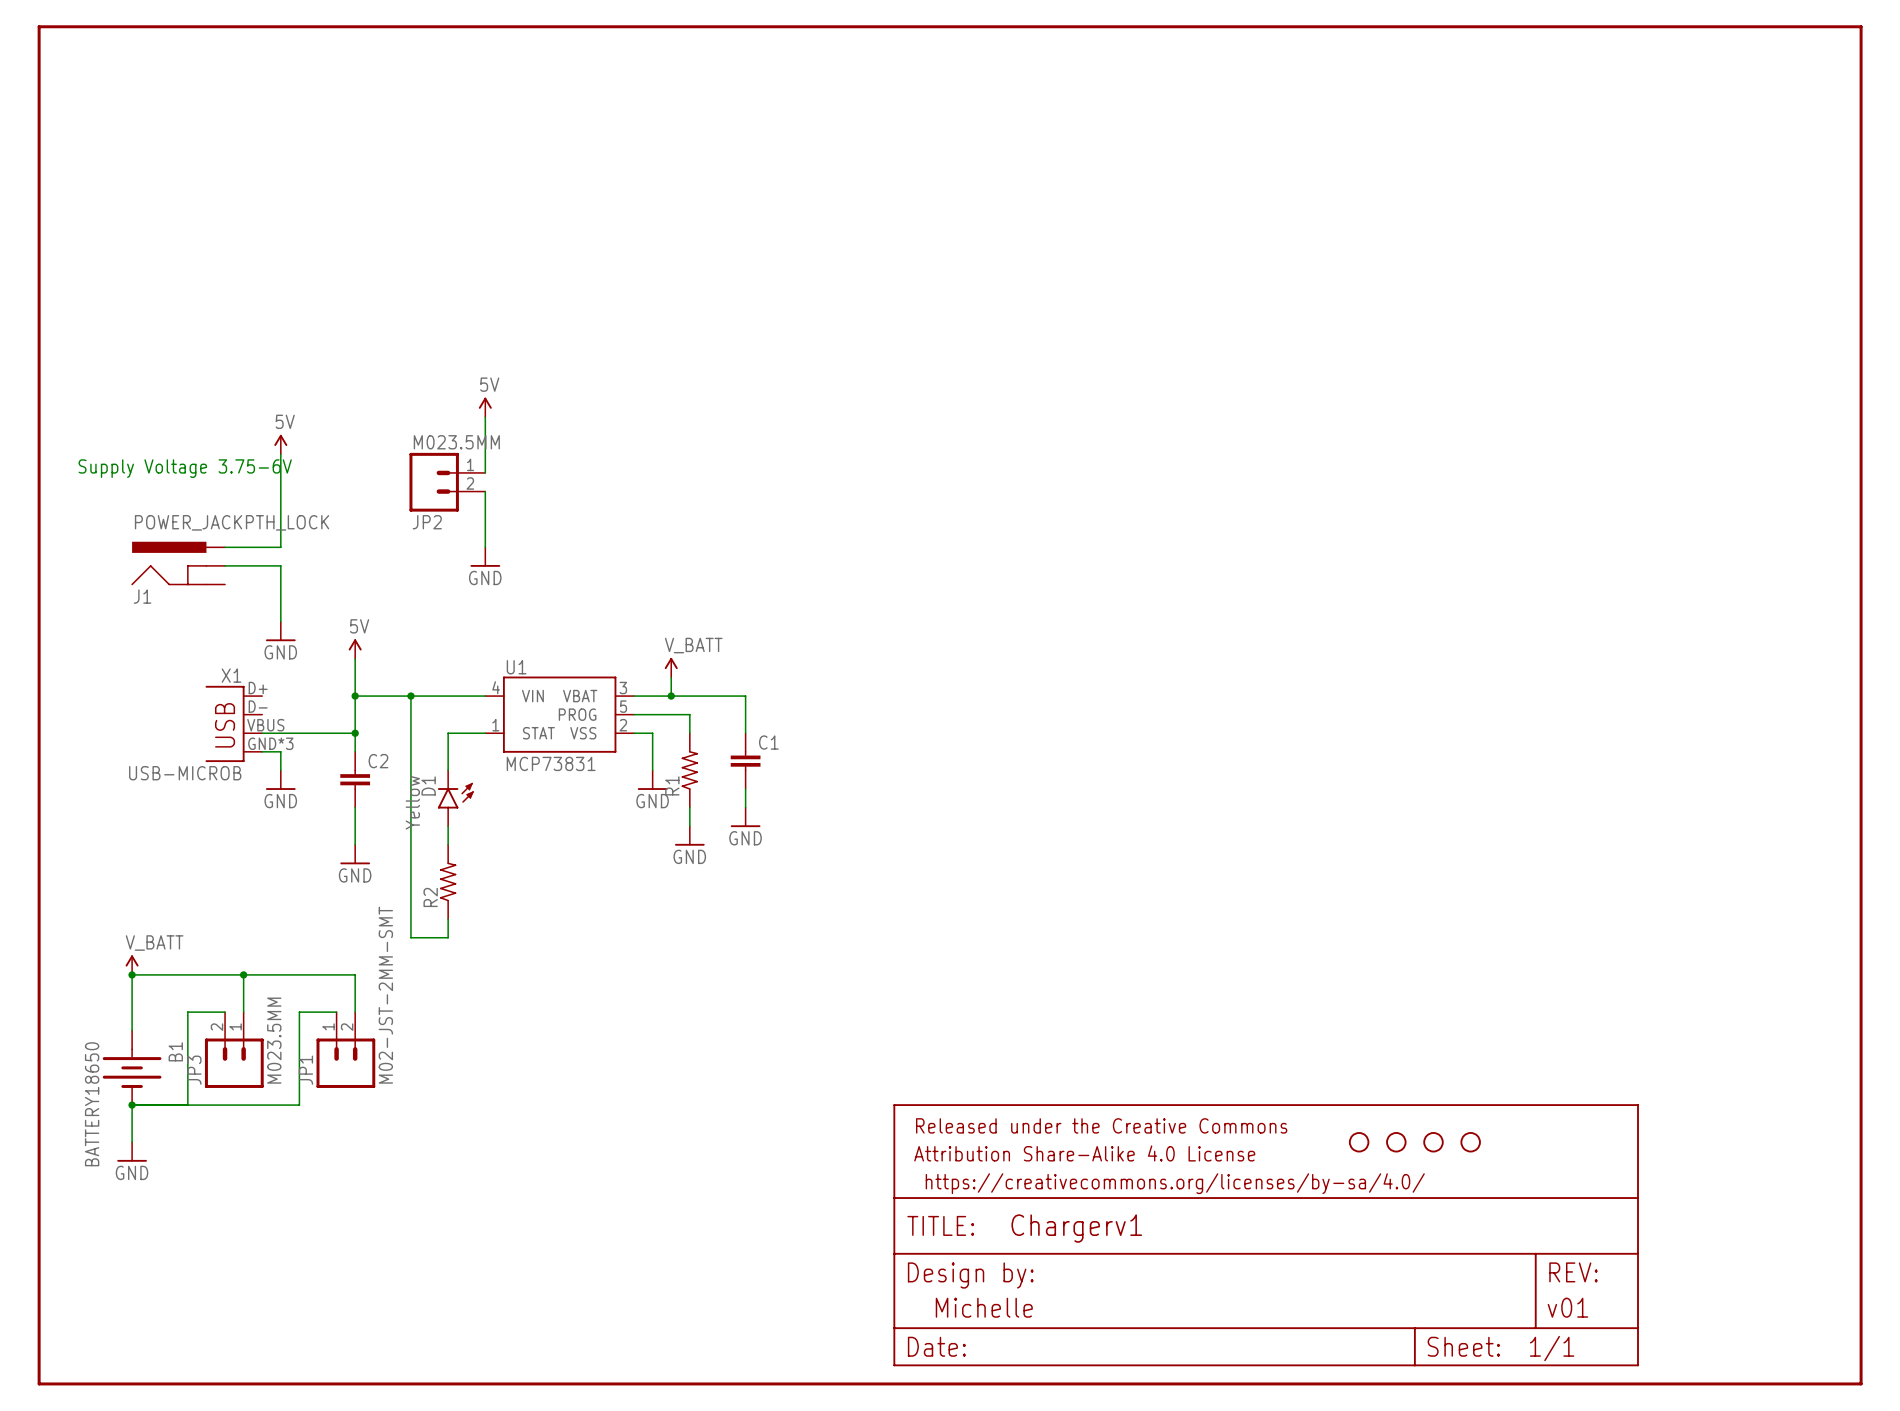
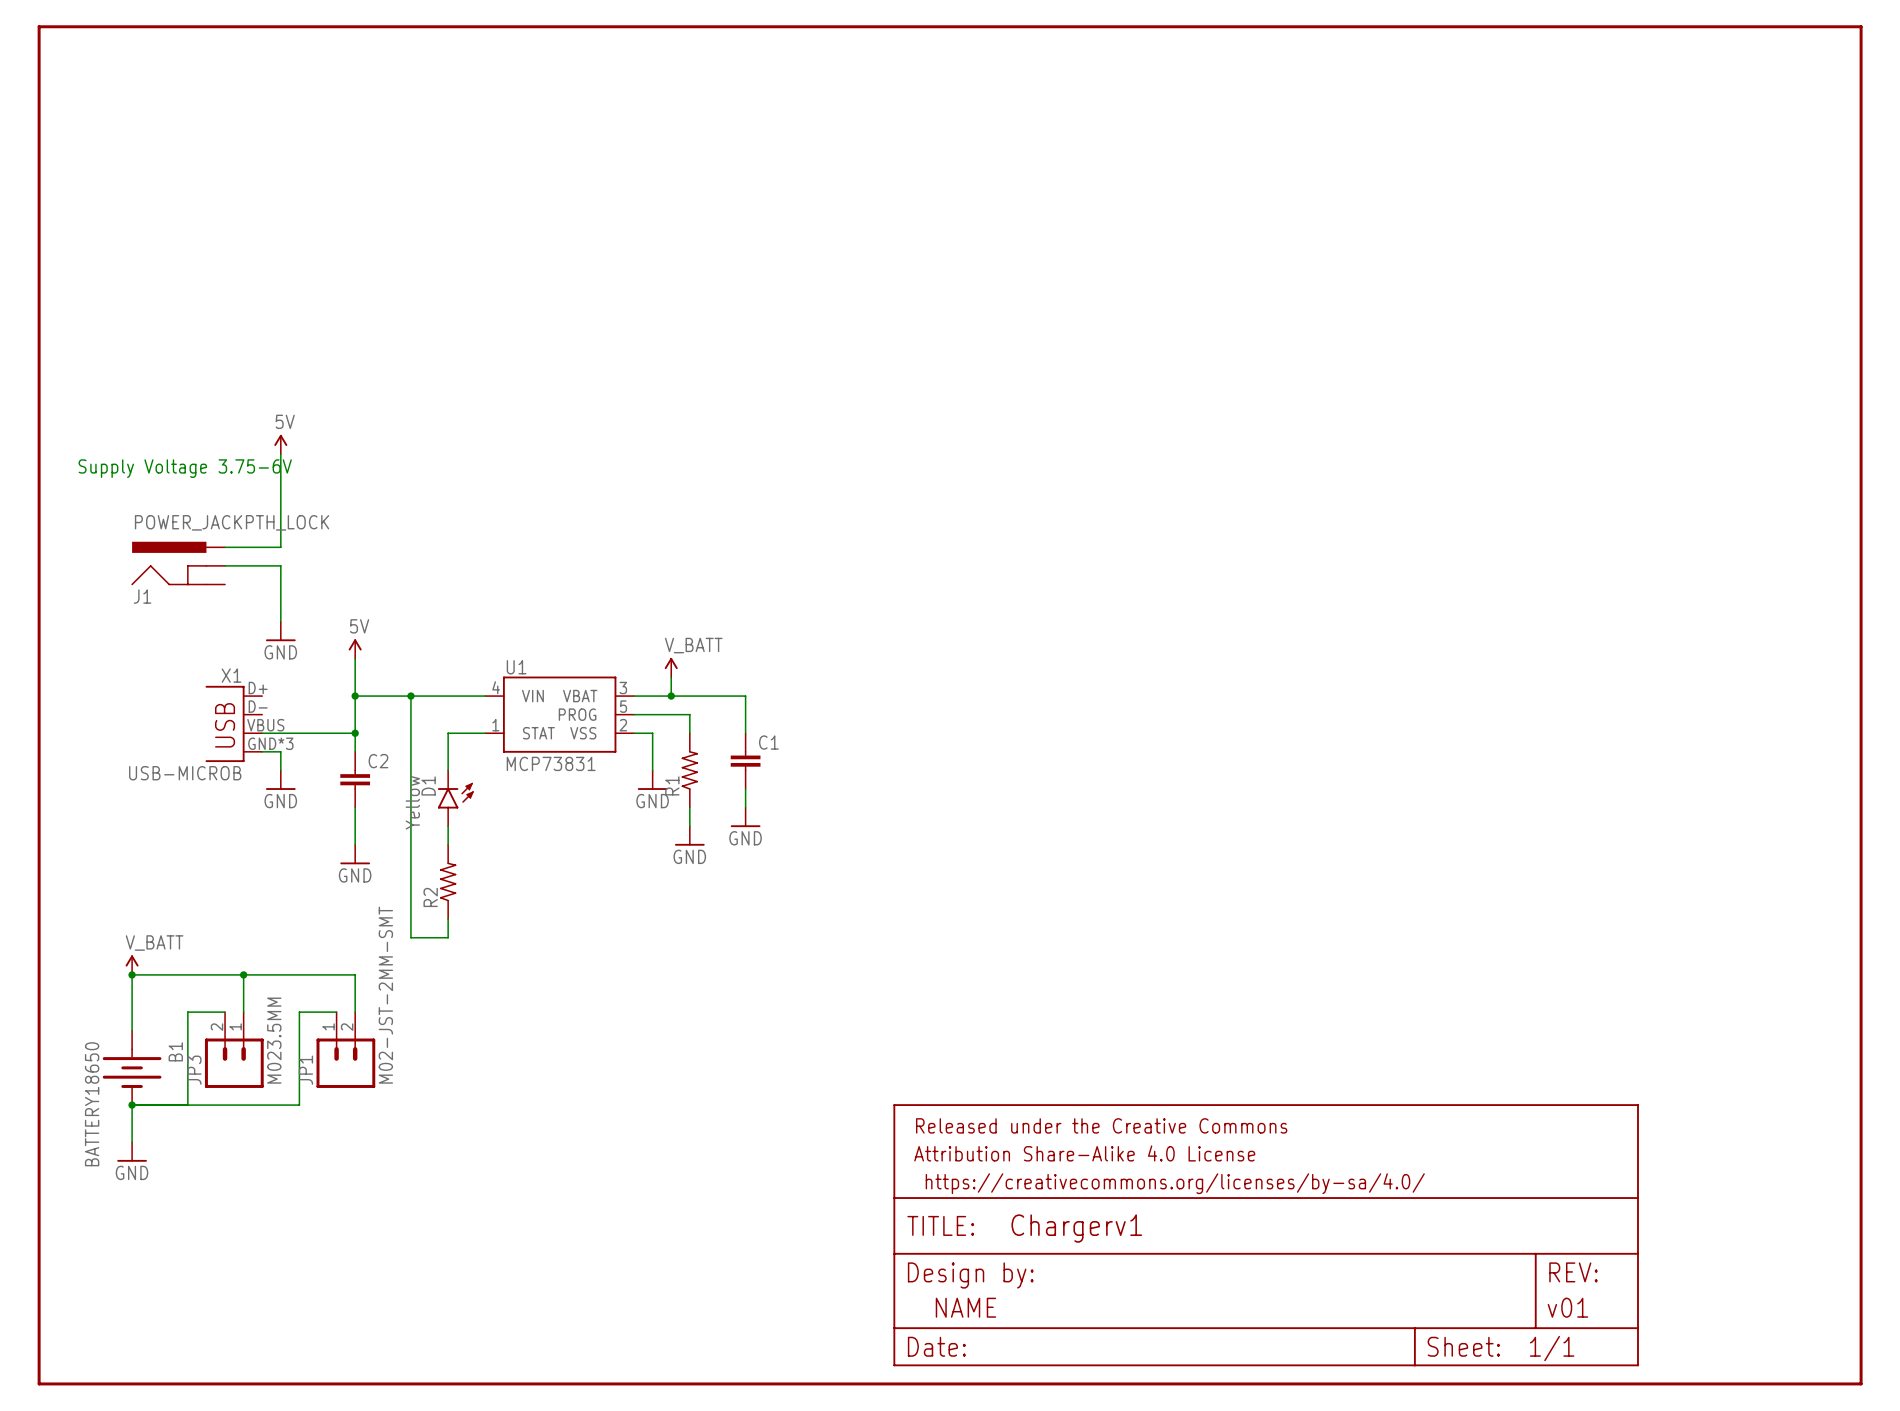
power symbol: 5V (485, 407) -> none
wire: (485, 417) (485, 472) -> none
JP2: M023.5MM (447, 482) -> none
wire: (485, 491) (485, 547) -> none
power symbol: GND (485, 557) -> none
part: (1359, 1142) -> none
part: (1396, 1142) -> none
part: (1433, 1142) -> none
part: (1470, 1142) -> none
part text: Michelle (984, 1307) -> NAME (965, 1307)

